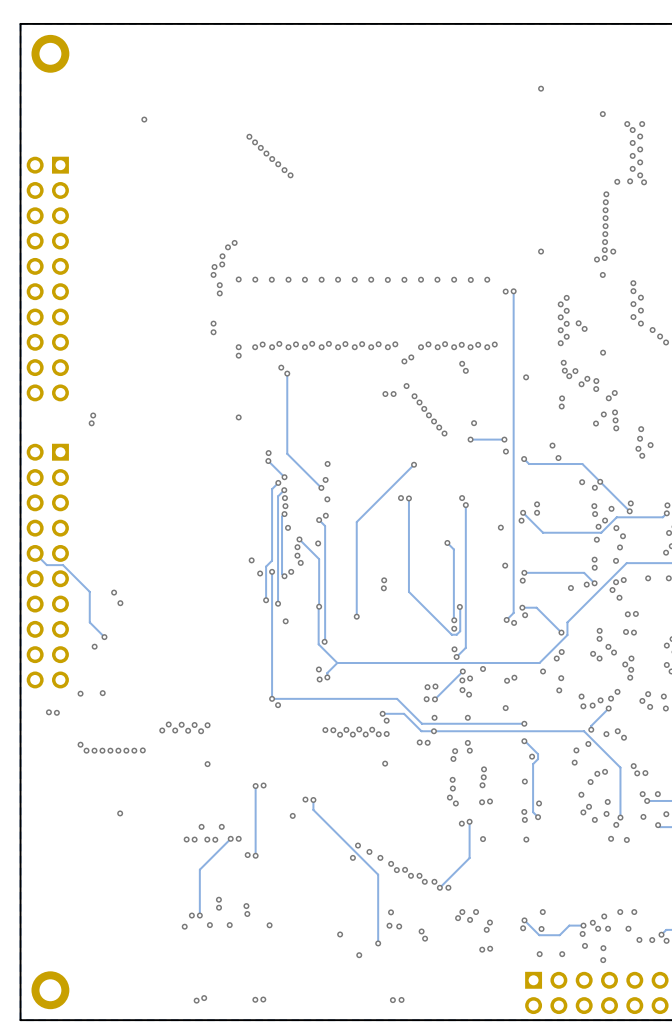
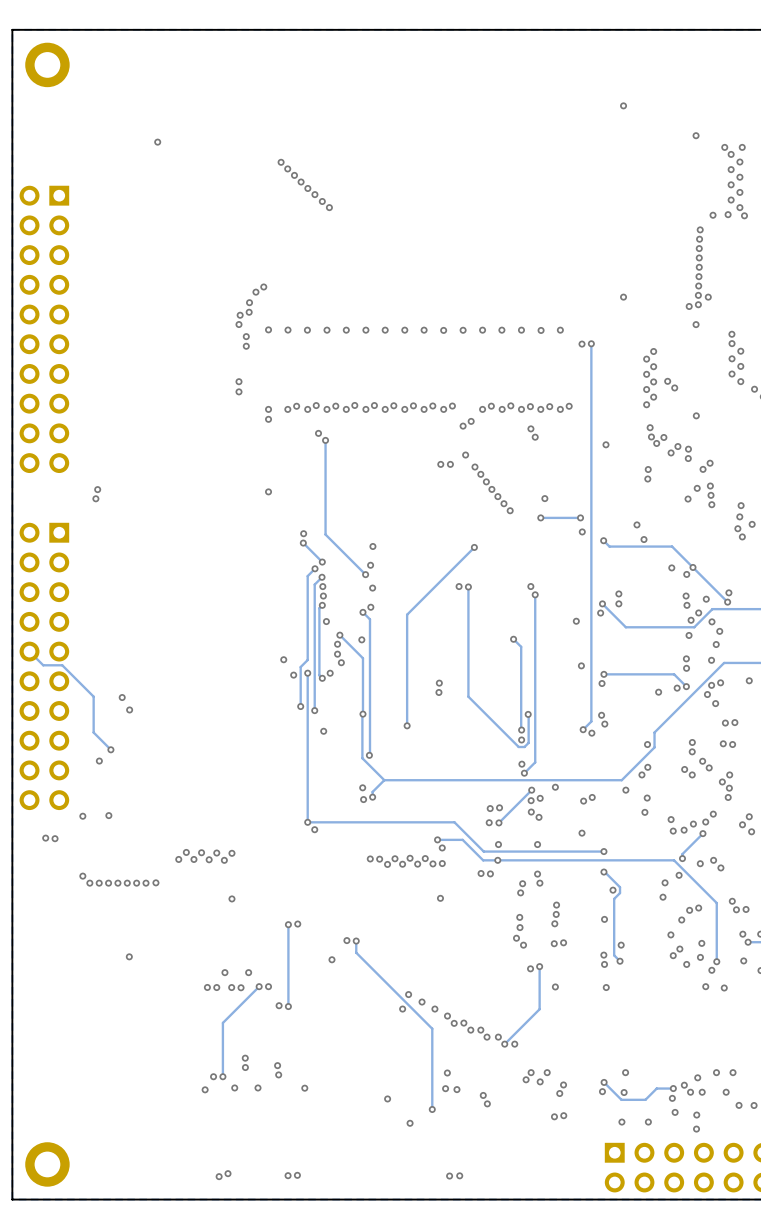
track: (522, 607) (536, 607) (561, 632) -> none

